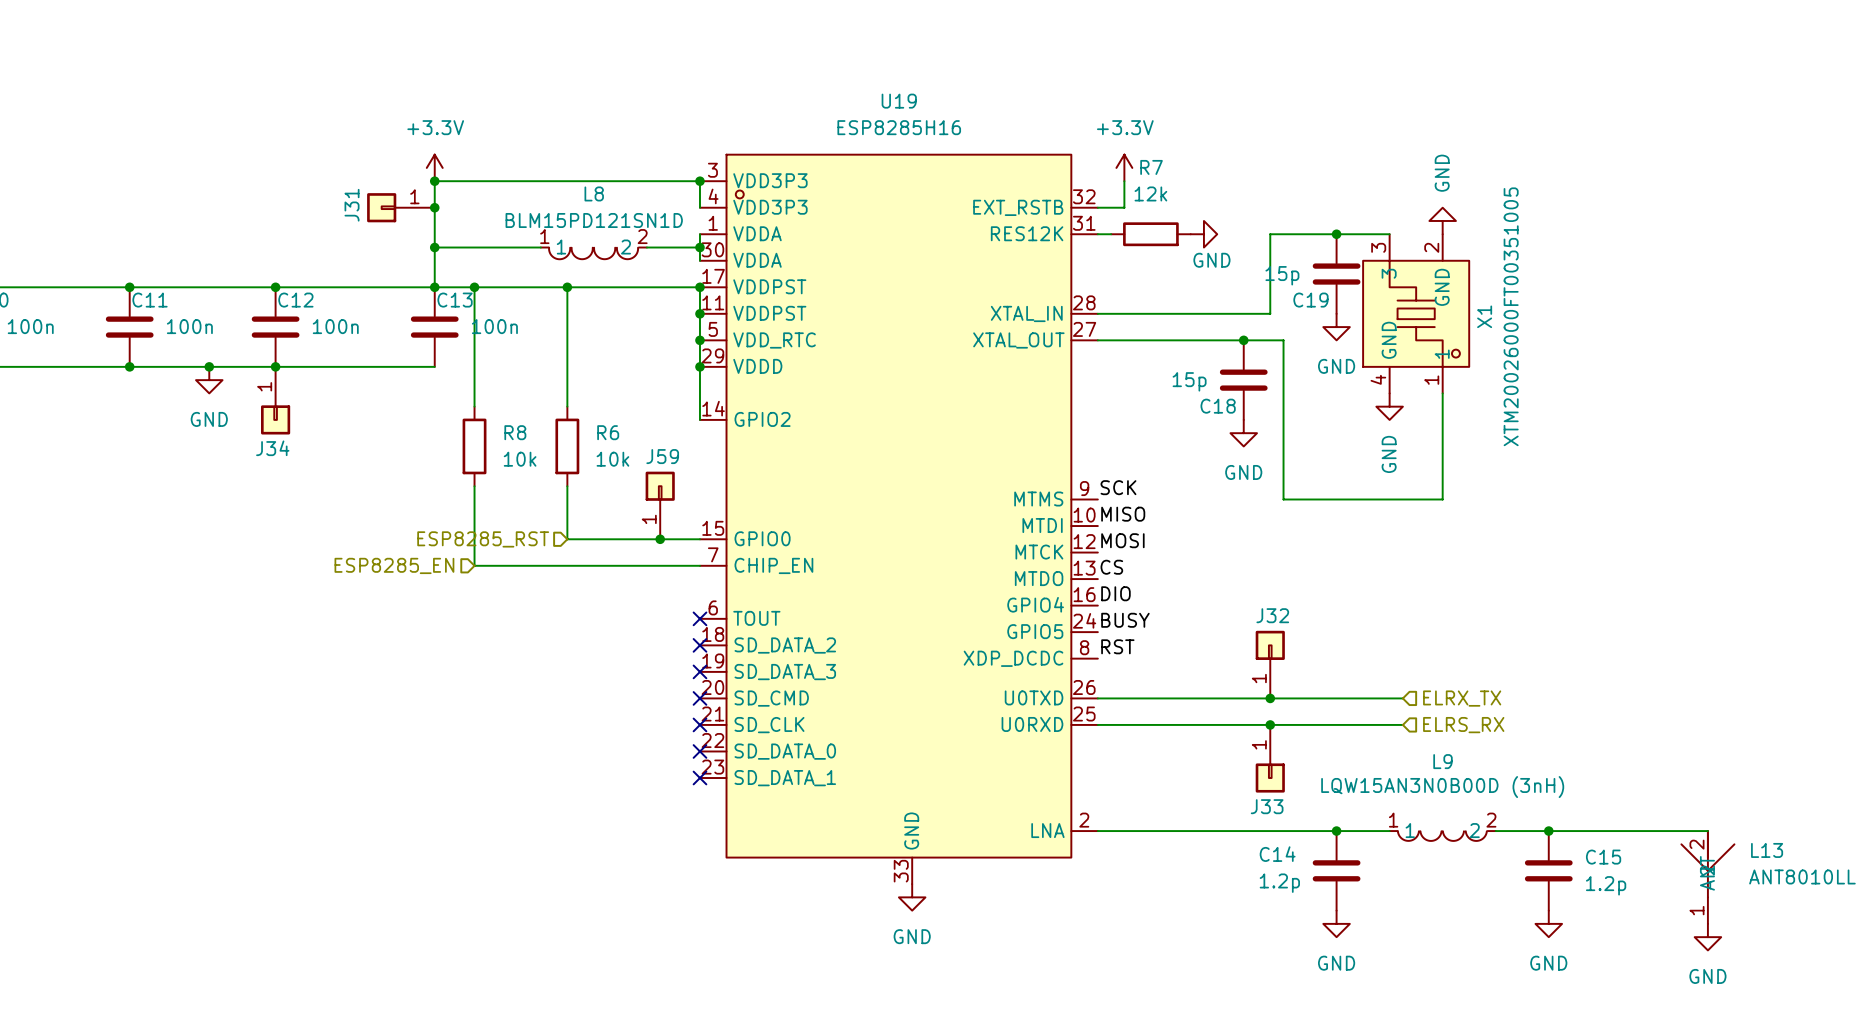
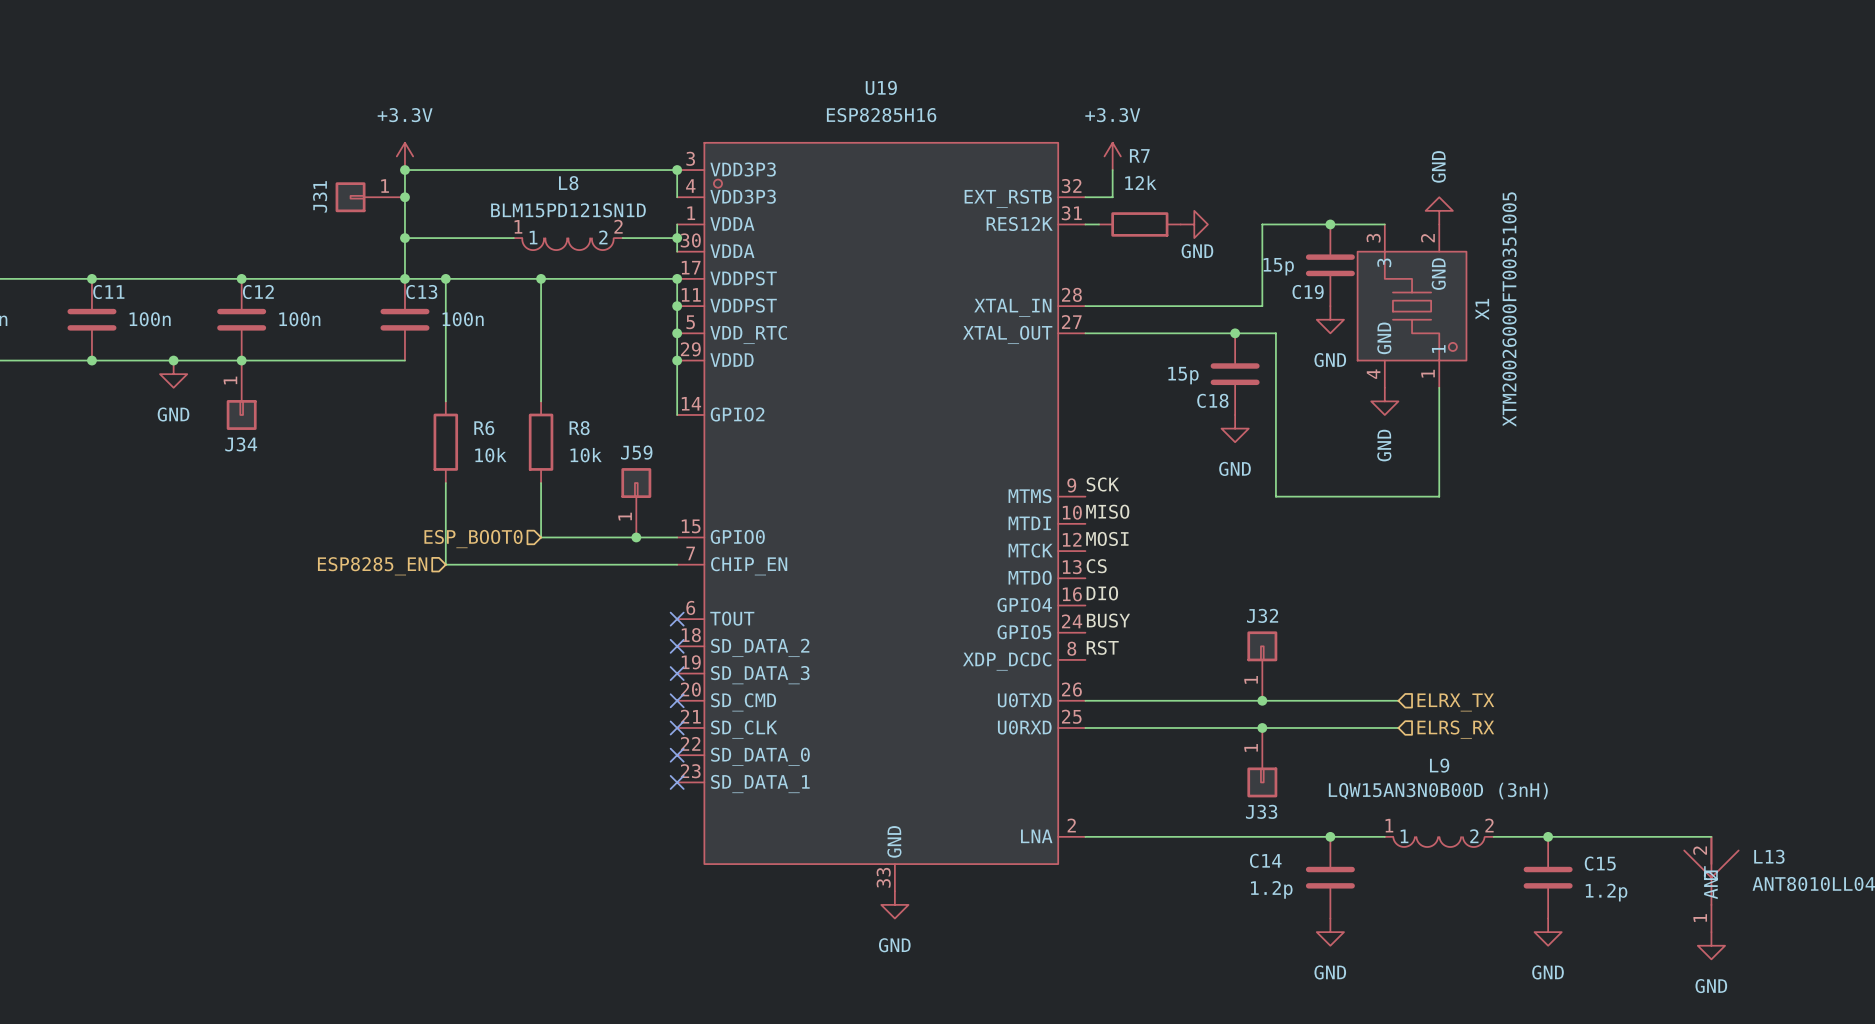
R8 name: R8 (515, 432) -> R6 (484, 428)
R6 name: R6 (608, 432) -> R8 (579, 428)
hierarchical label: ESP8285_RST (483, 539) -> ESP_BOOT0 (473, 539)

